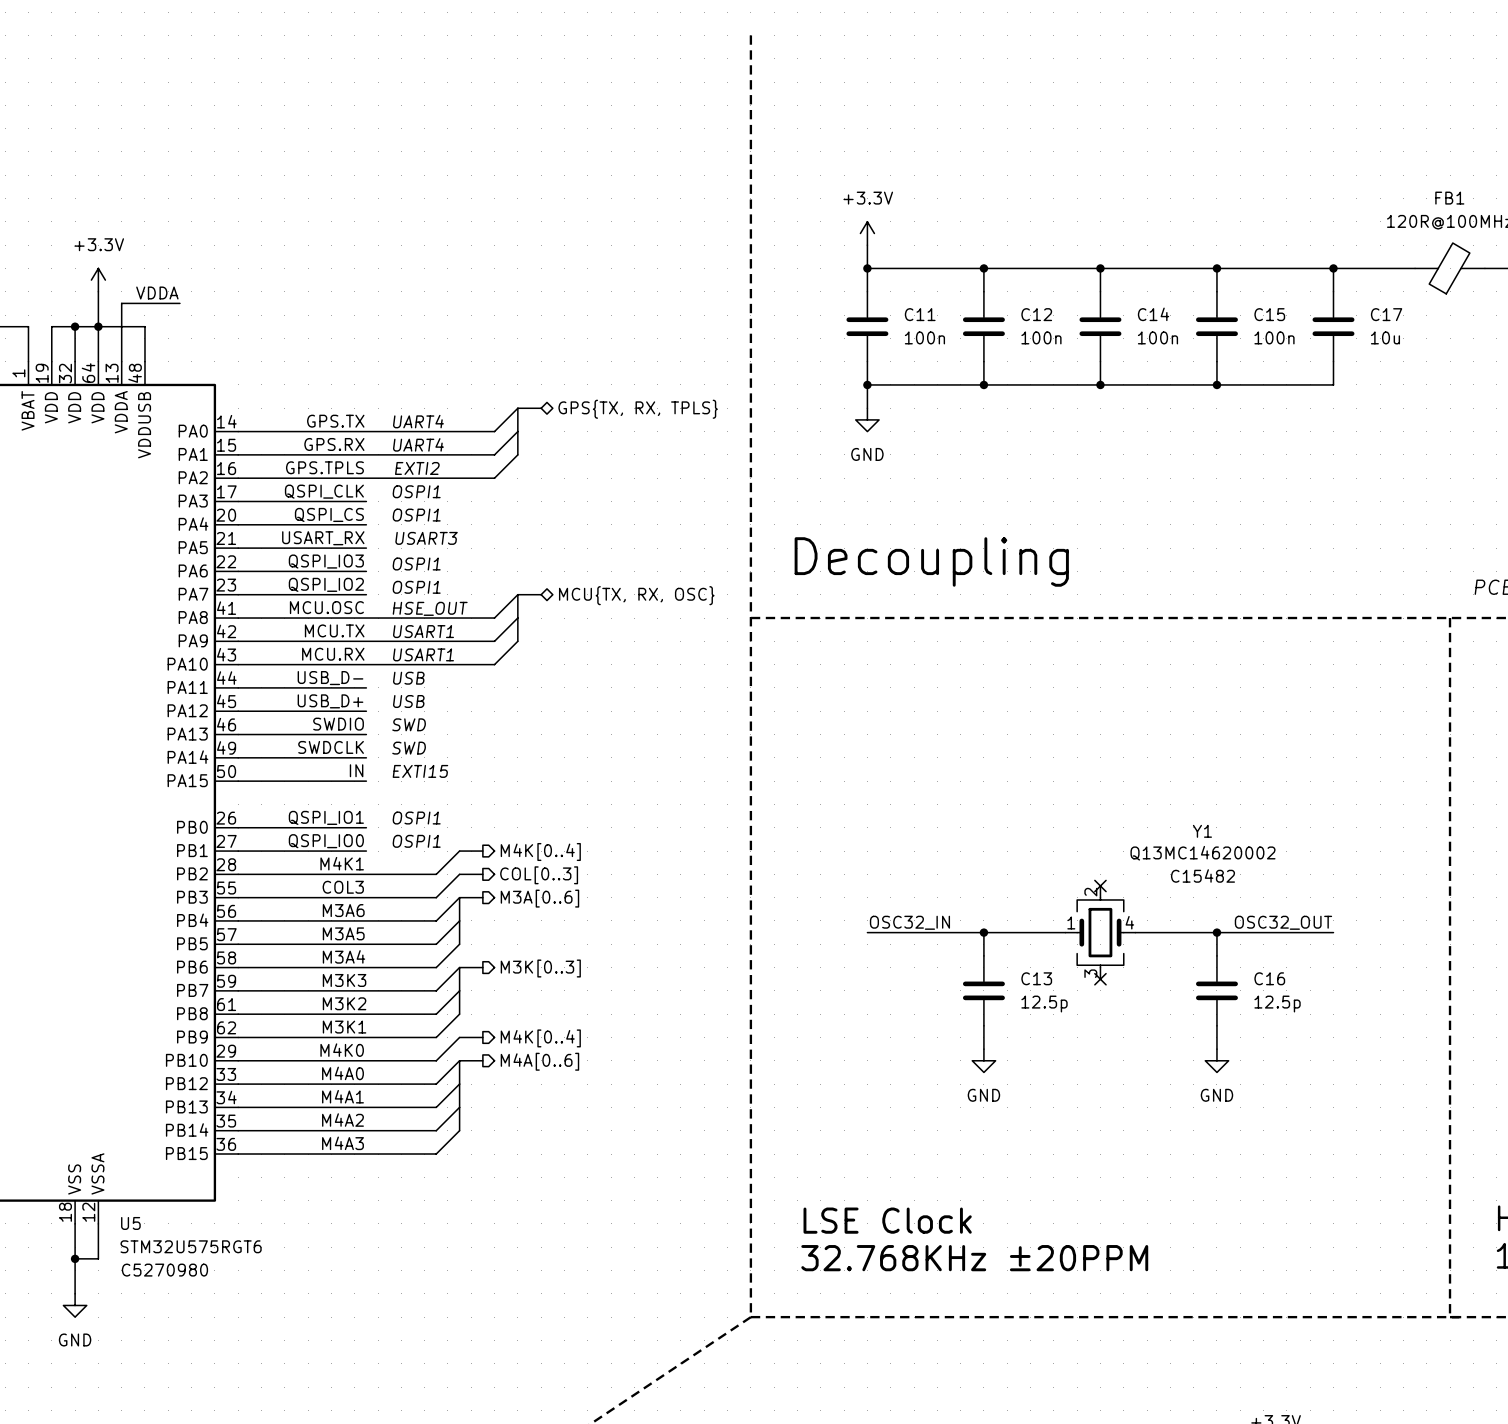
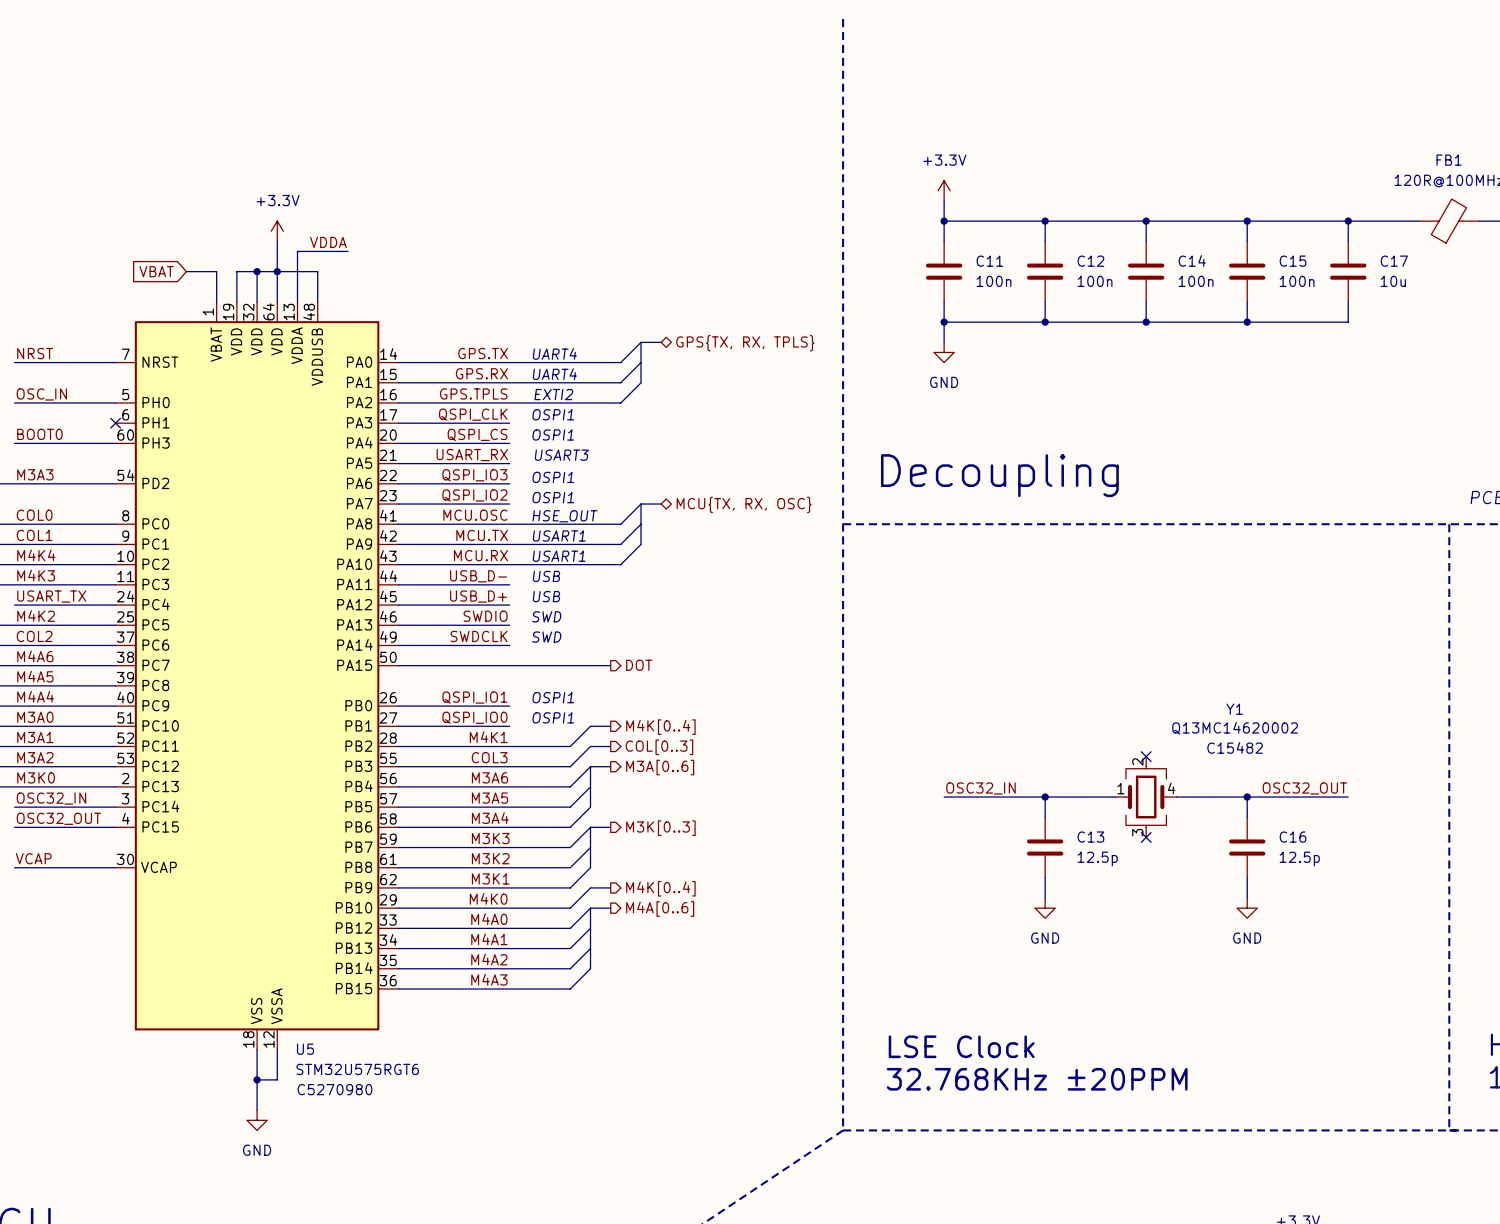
label: IN (356, 770) -> none
text: EXTI15 (420, 771) -> none
hierarchical label: none -> DOT (639, 665)
wire: none -> (509, 665) (610, 665)

